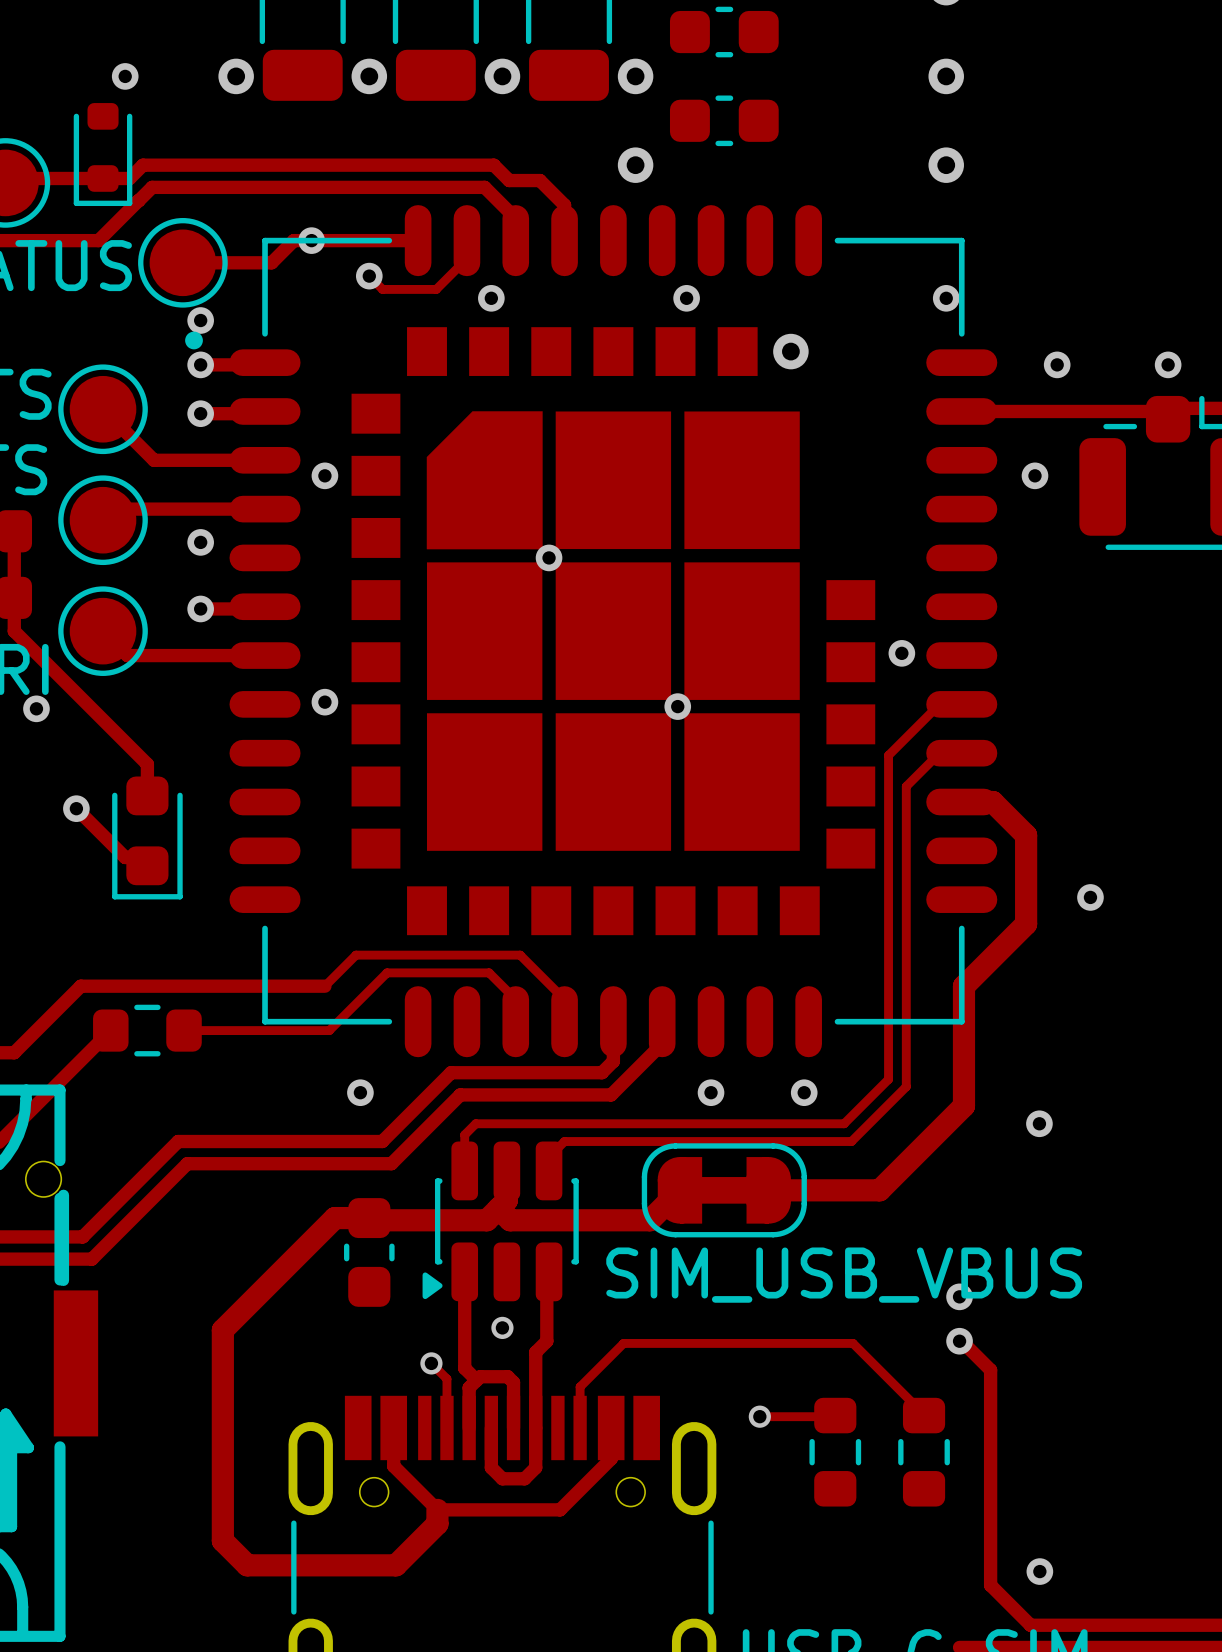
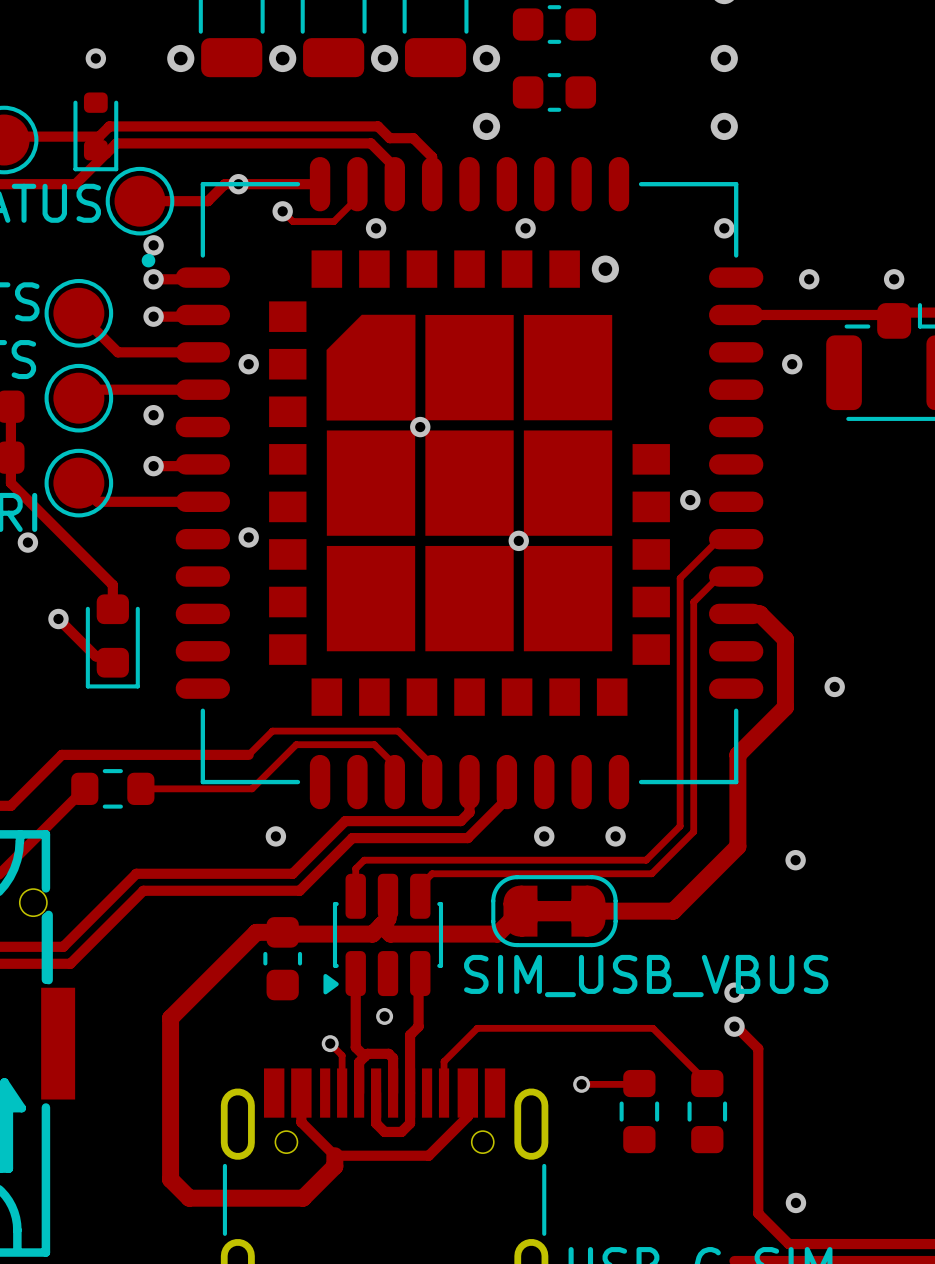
part position: (103, 154) -> (95, 131)

